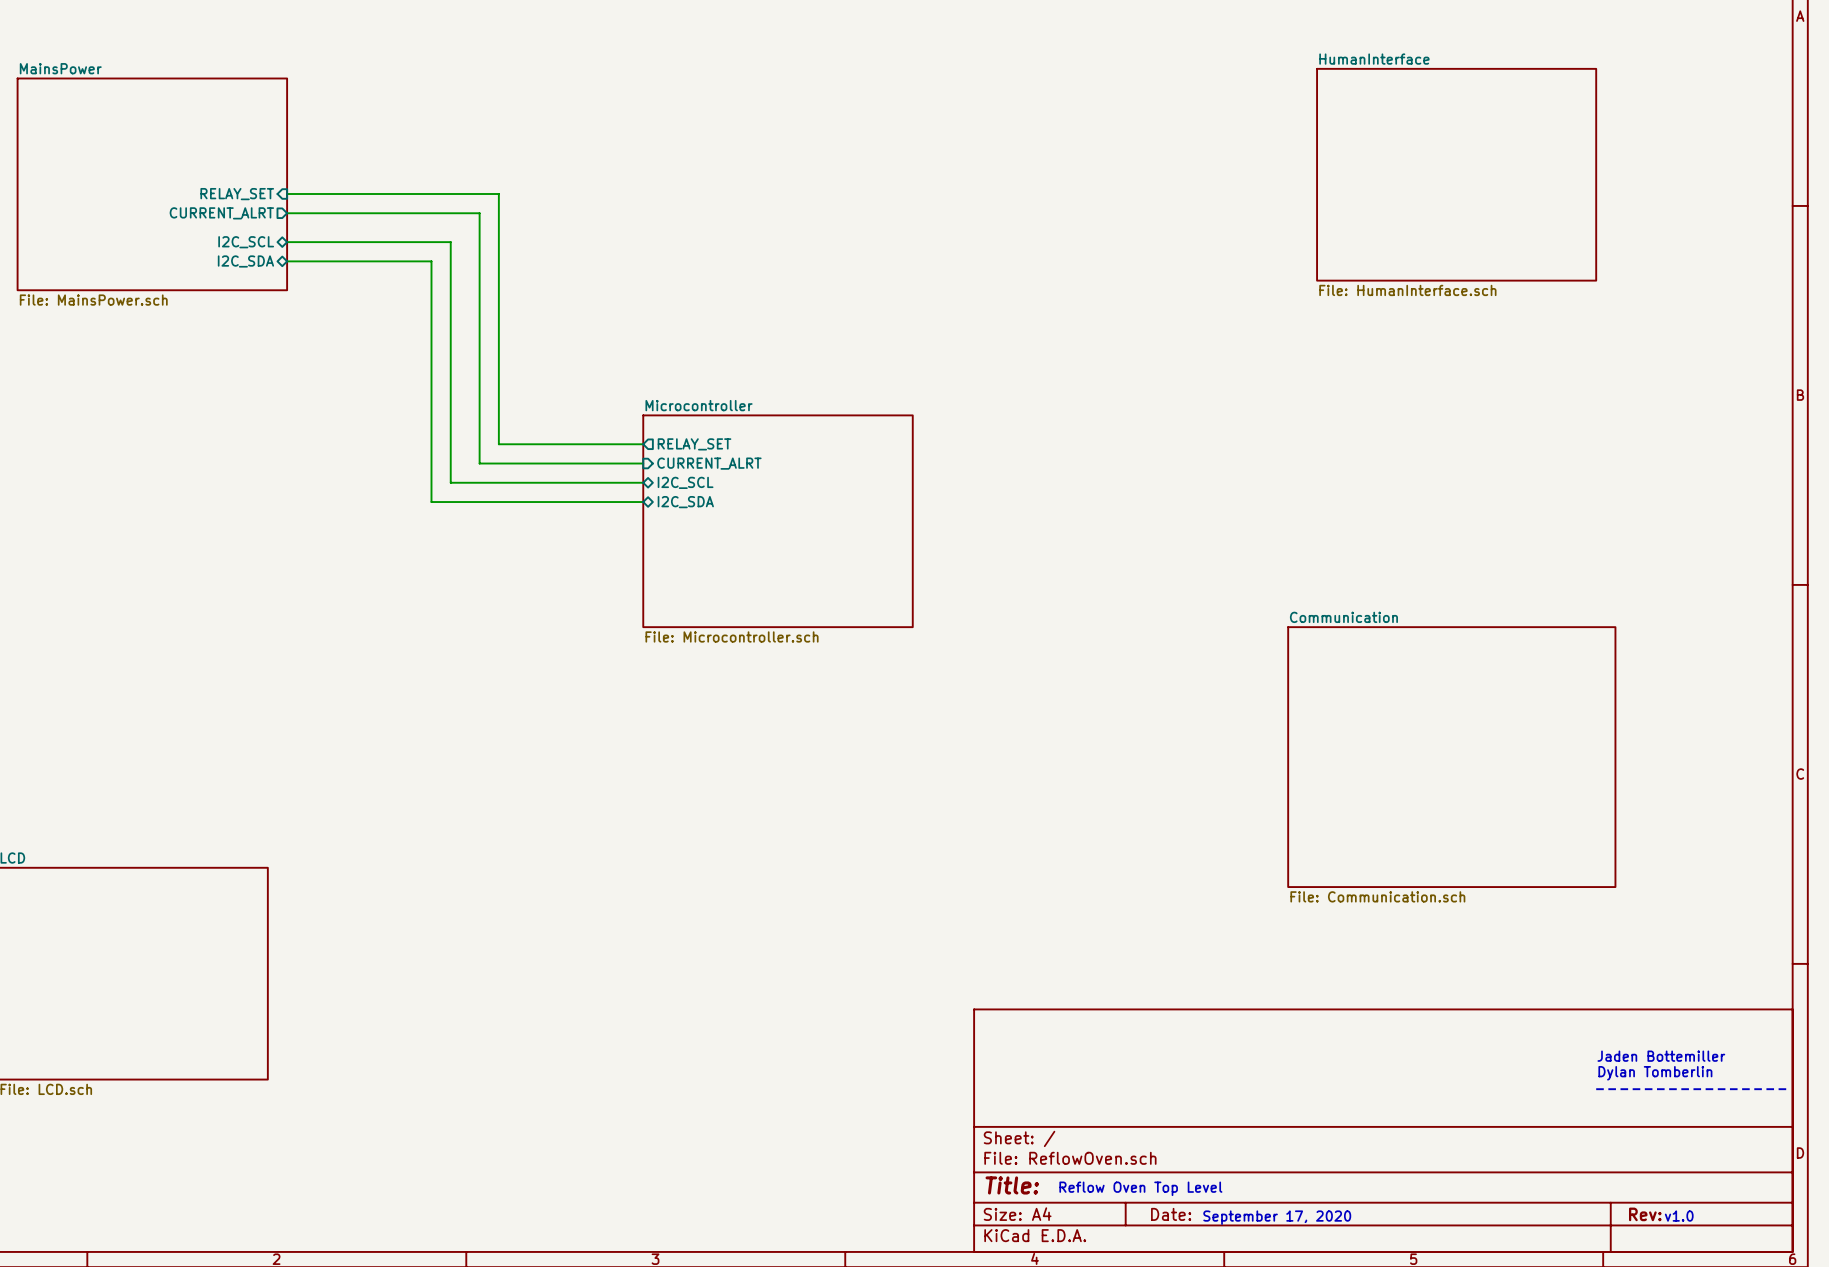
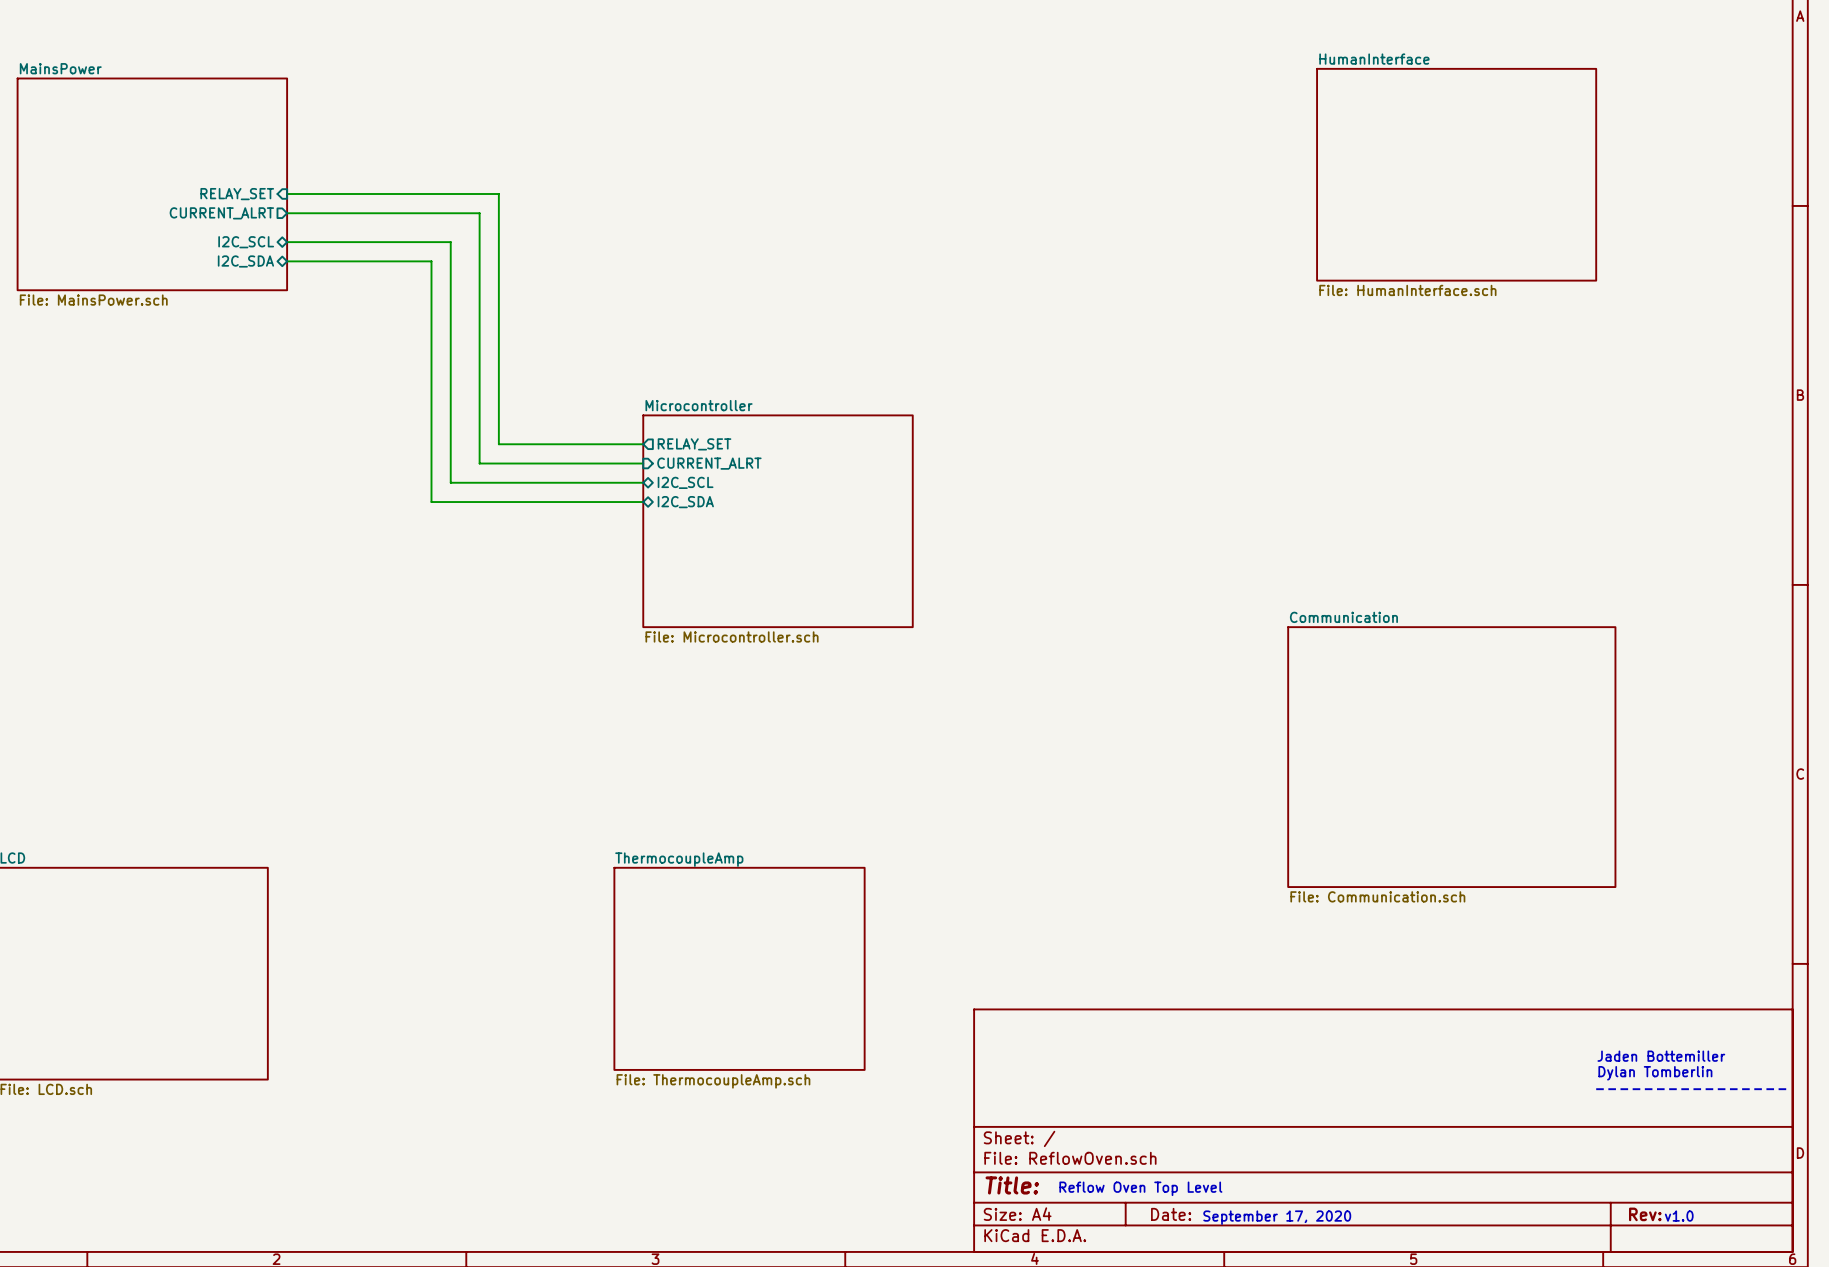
sheet ThermocoupleAmp: none -> File: ThermocoupleAmp.sch (739, 968)

